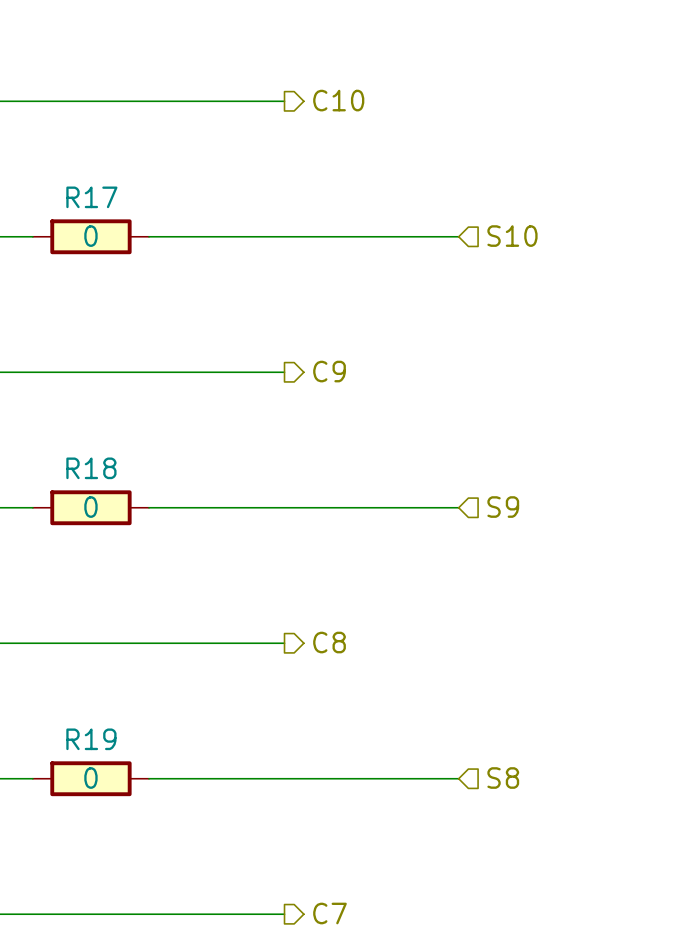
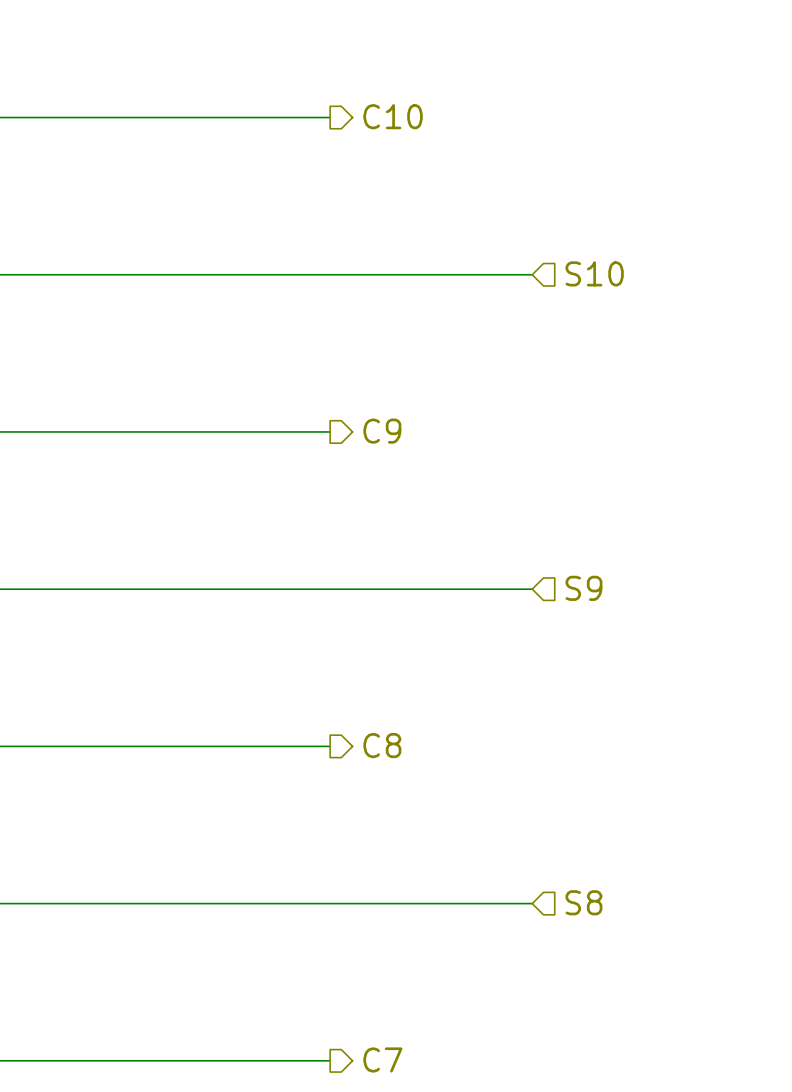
R17: 0 (90, 236) -> none
R18: 0 (90, 507) -> none
R19: 0 (90, 778) -> none

